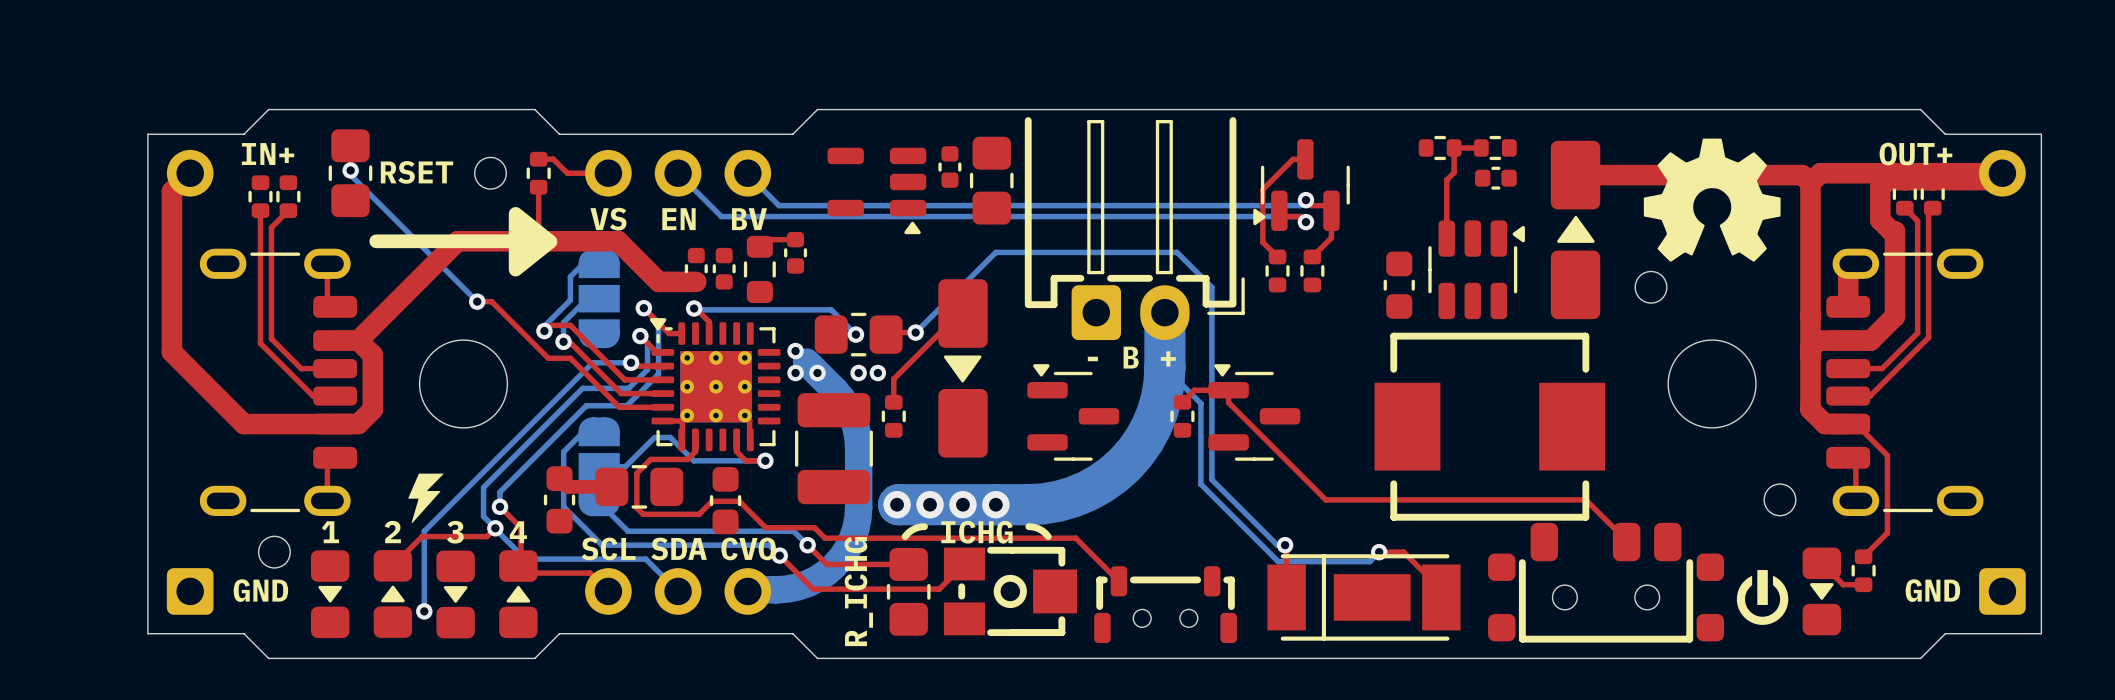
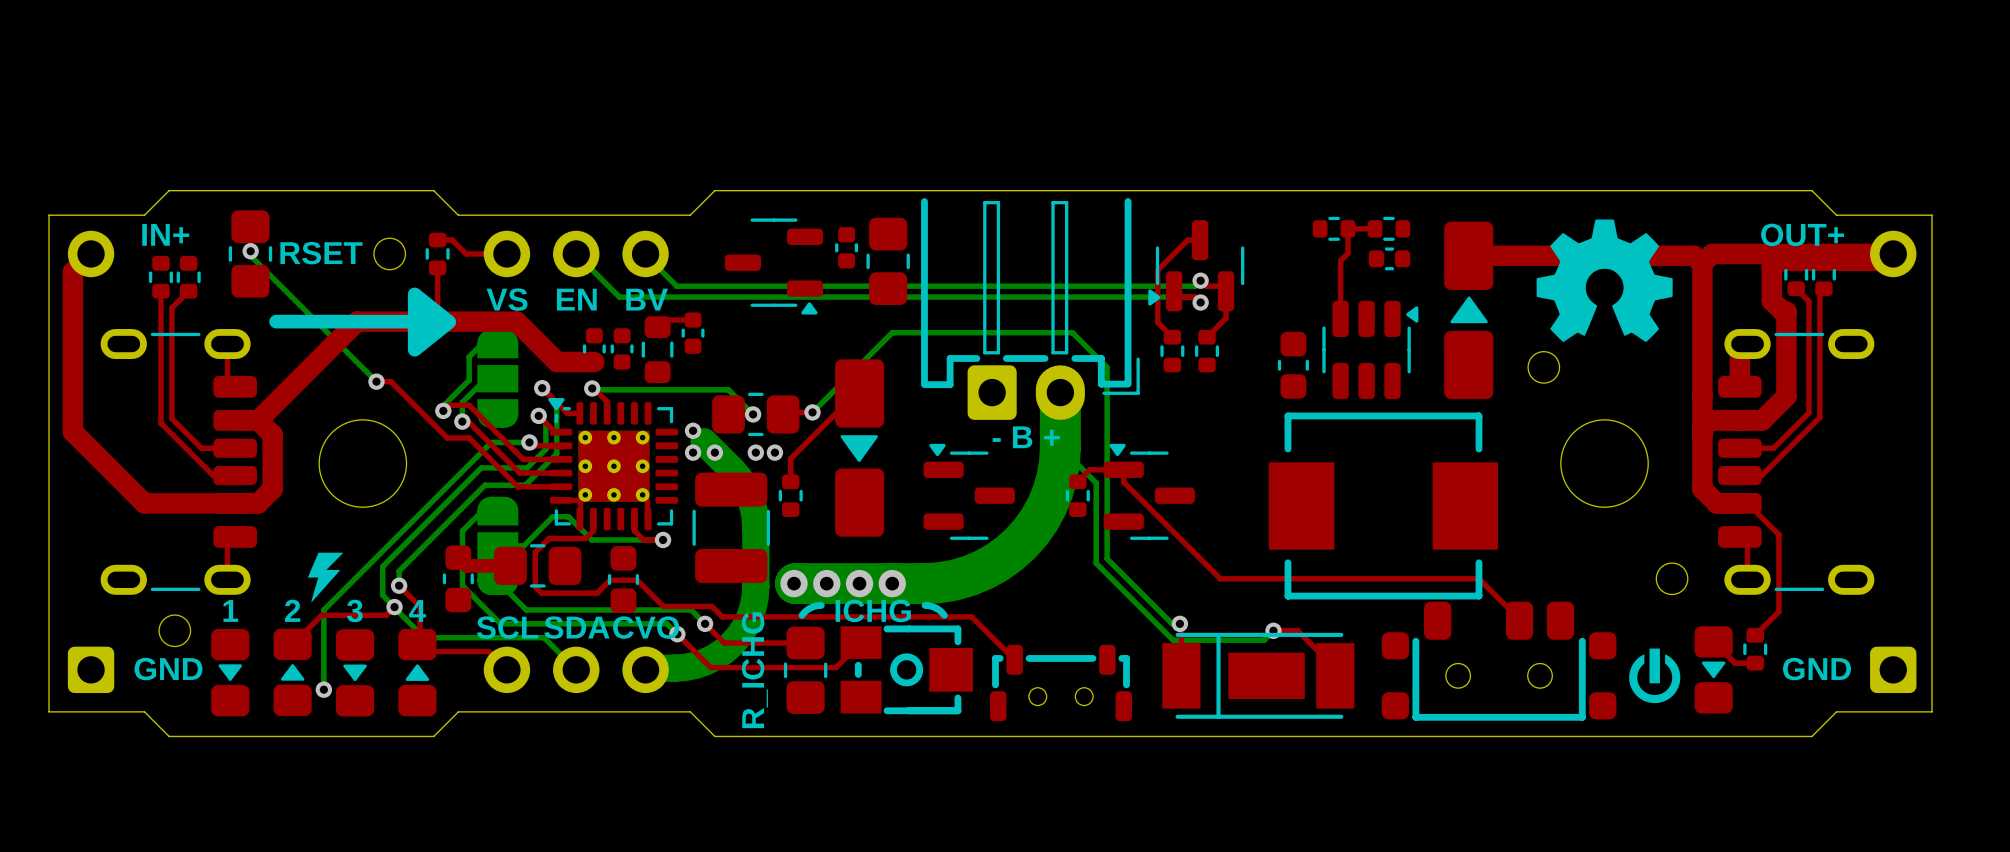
part footprint: [827, 147, 927, 235] -> [724, 218, 824, 315]

